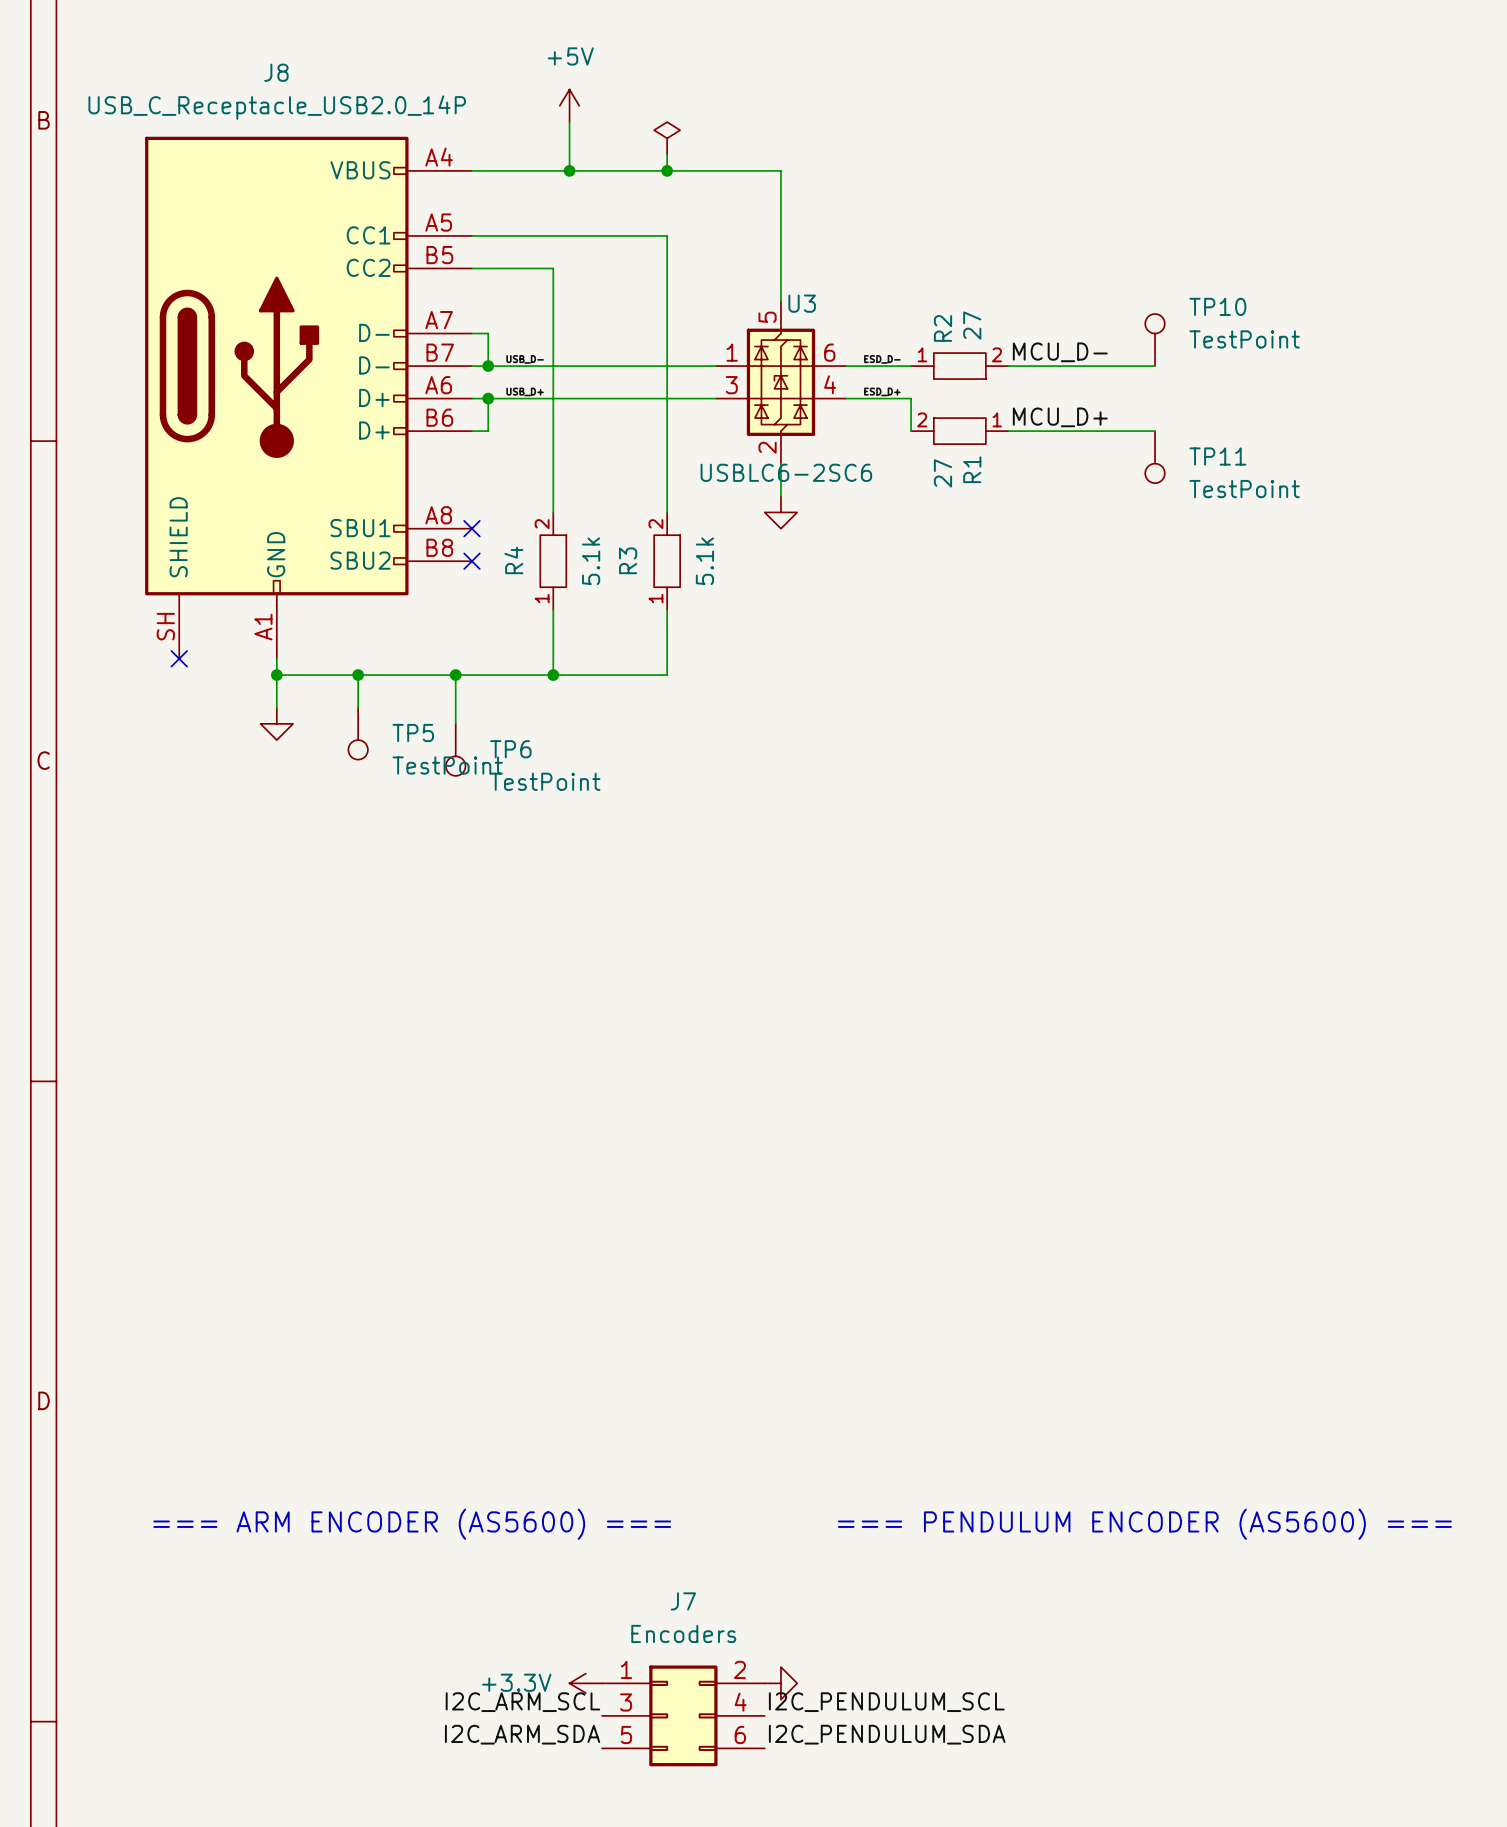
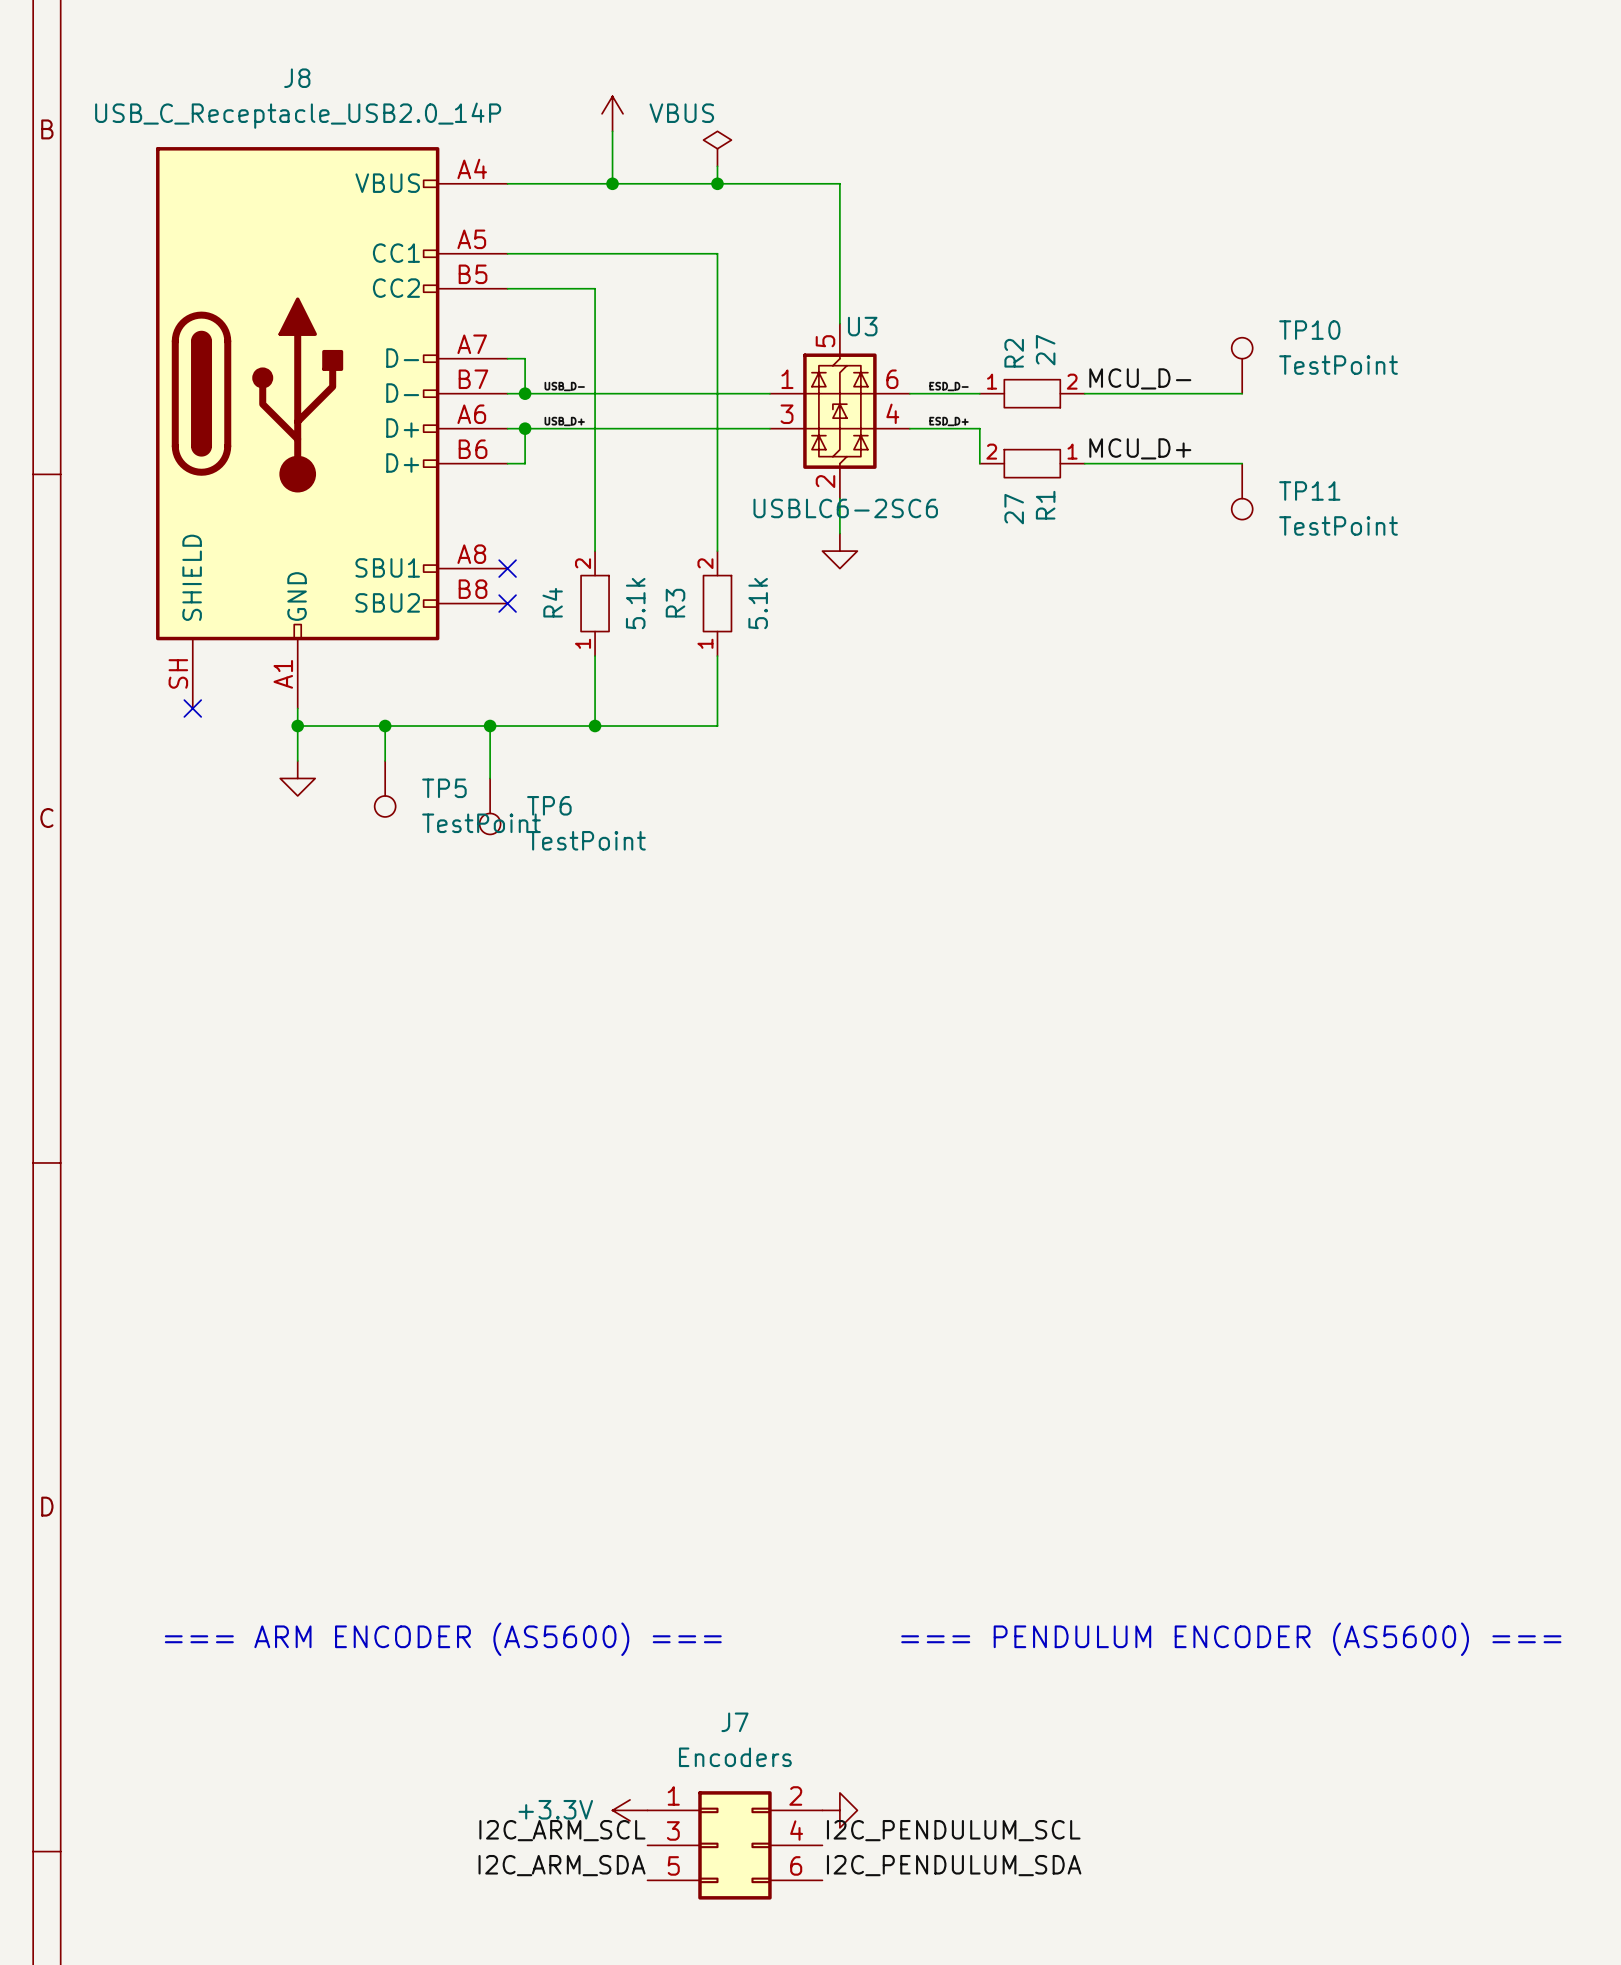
power symbol: +5V (569, 105) -> VBUS (612, 113)

